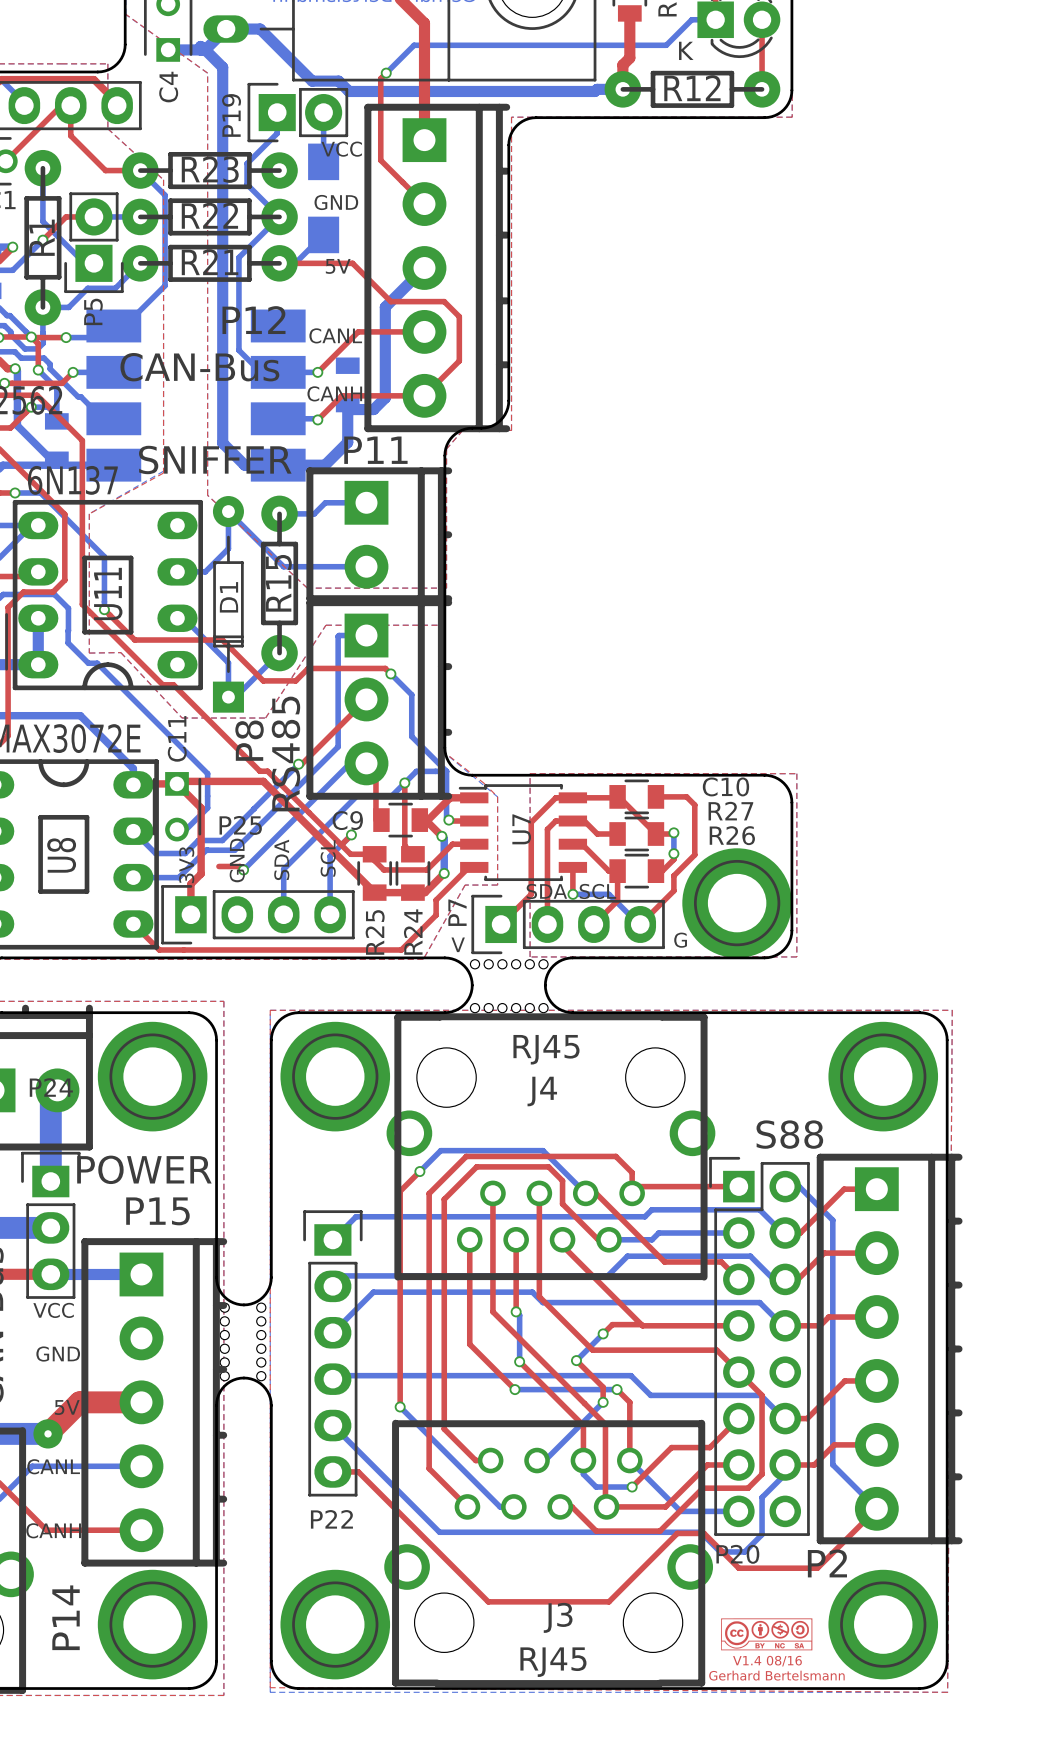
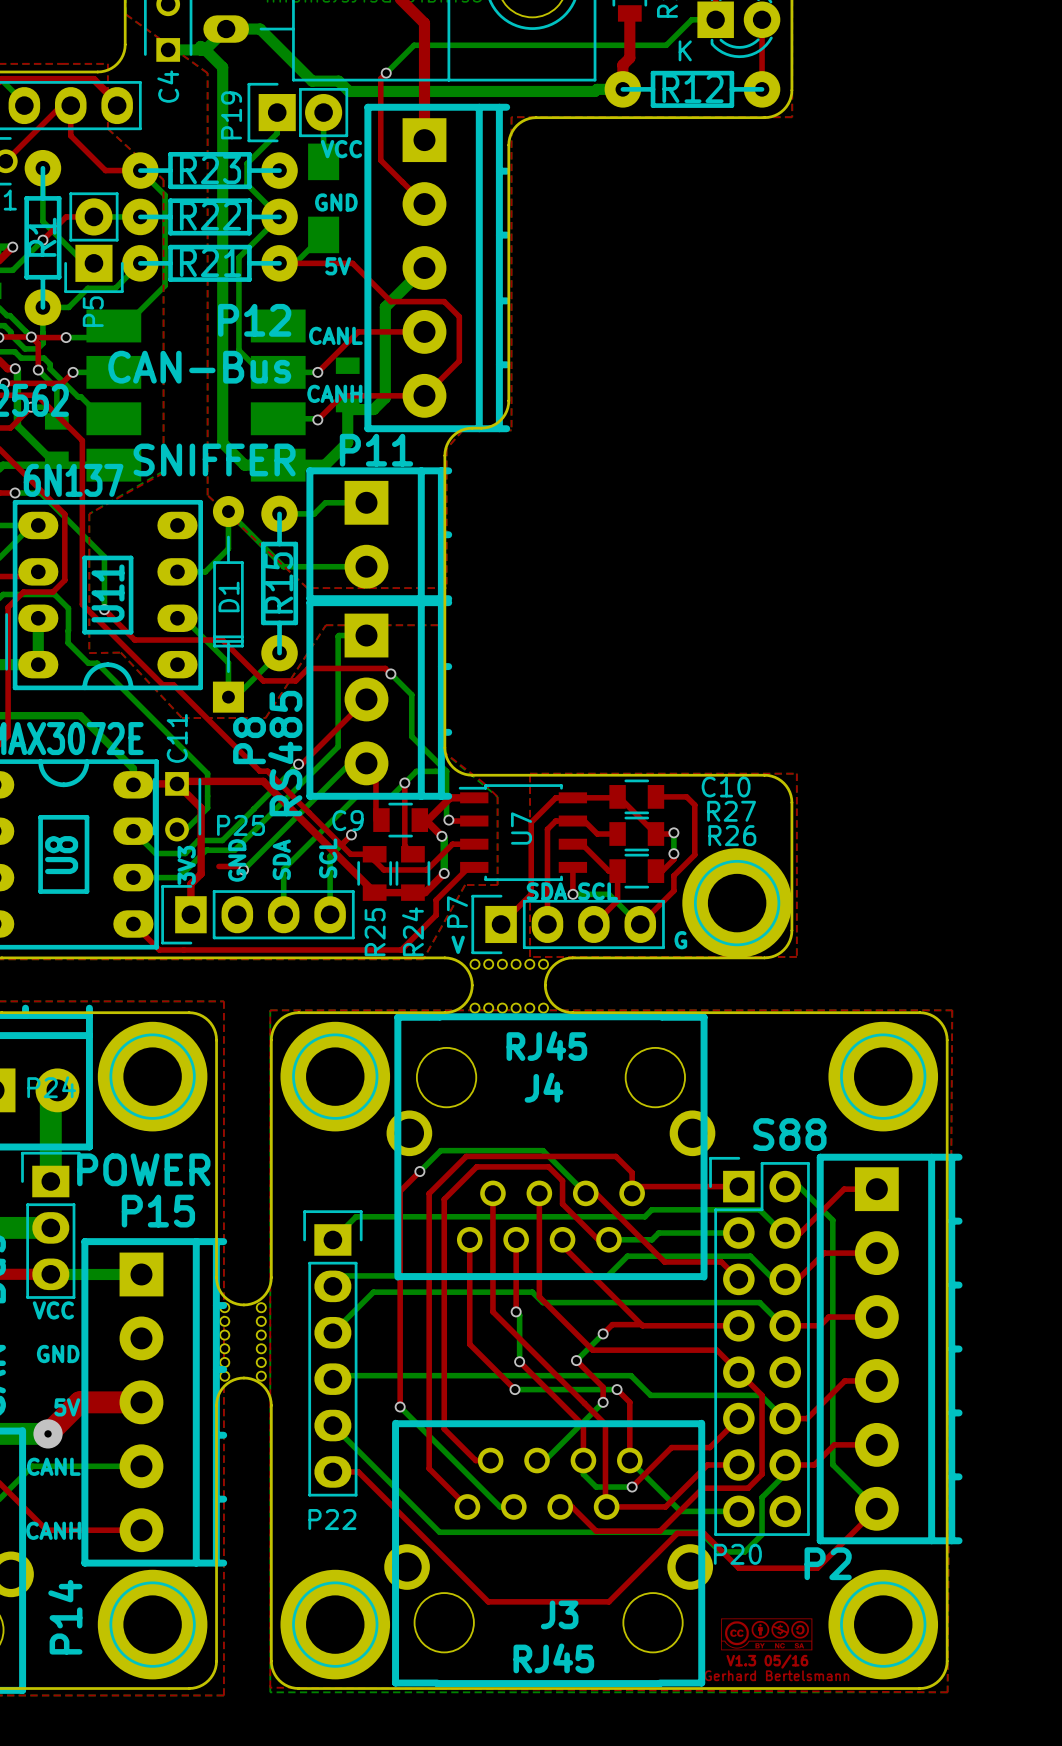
text: V1.4 08/16 (767, 1661) -> V1.3 05/16 (767, 1661)

